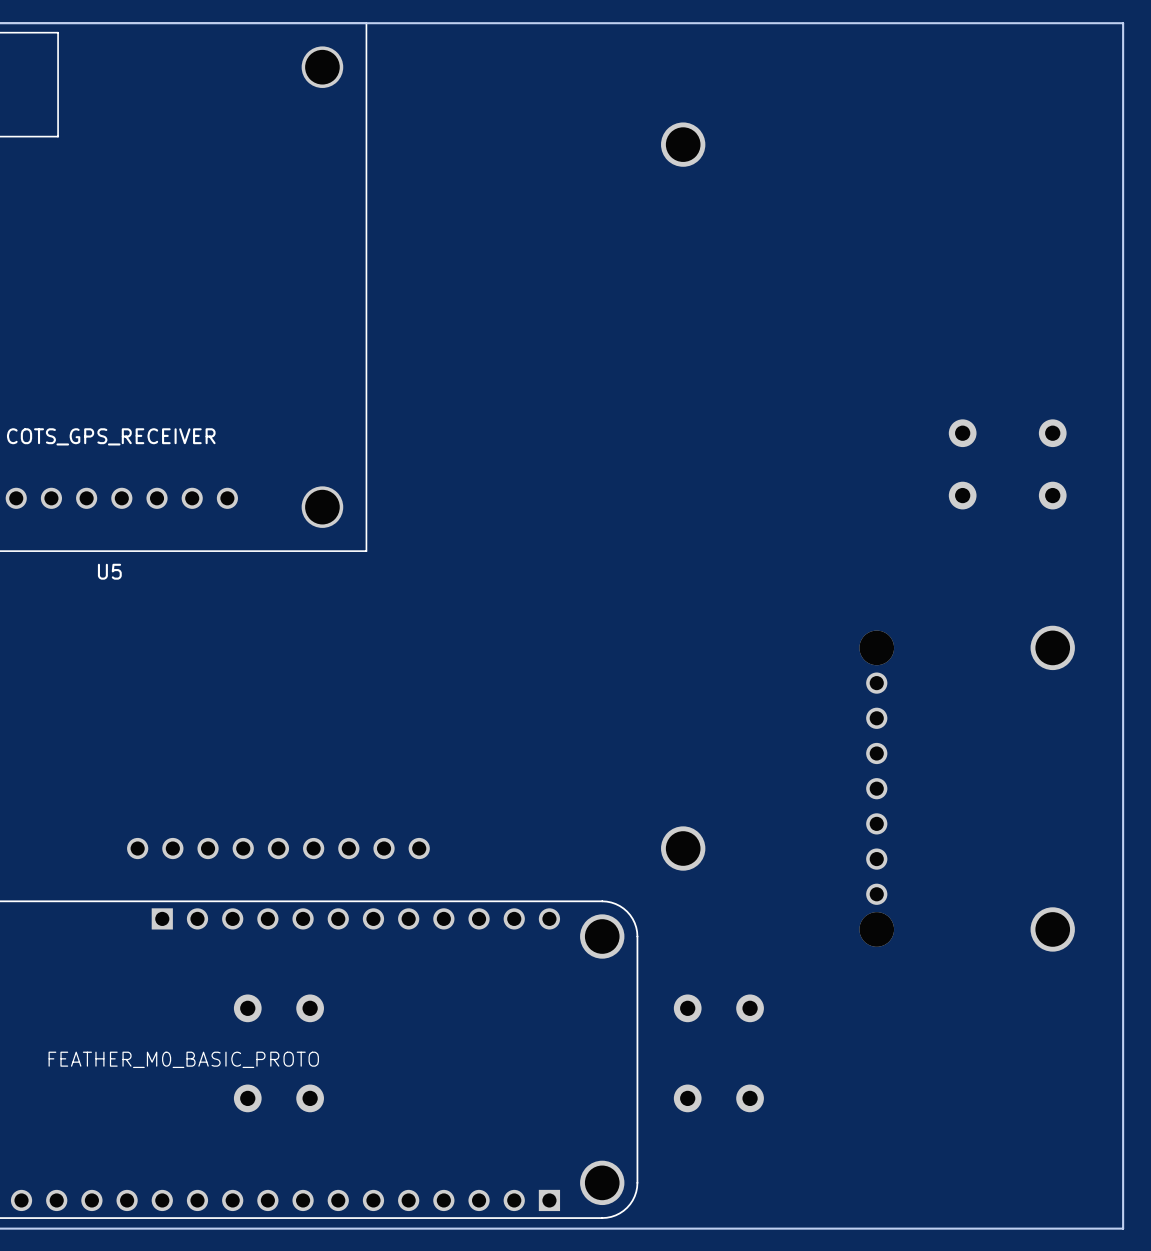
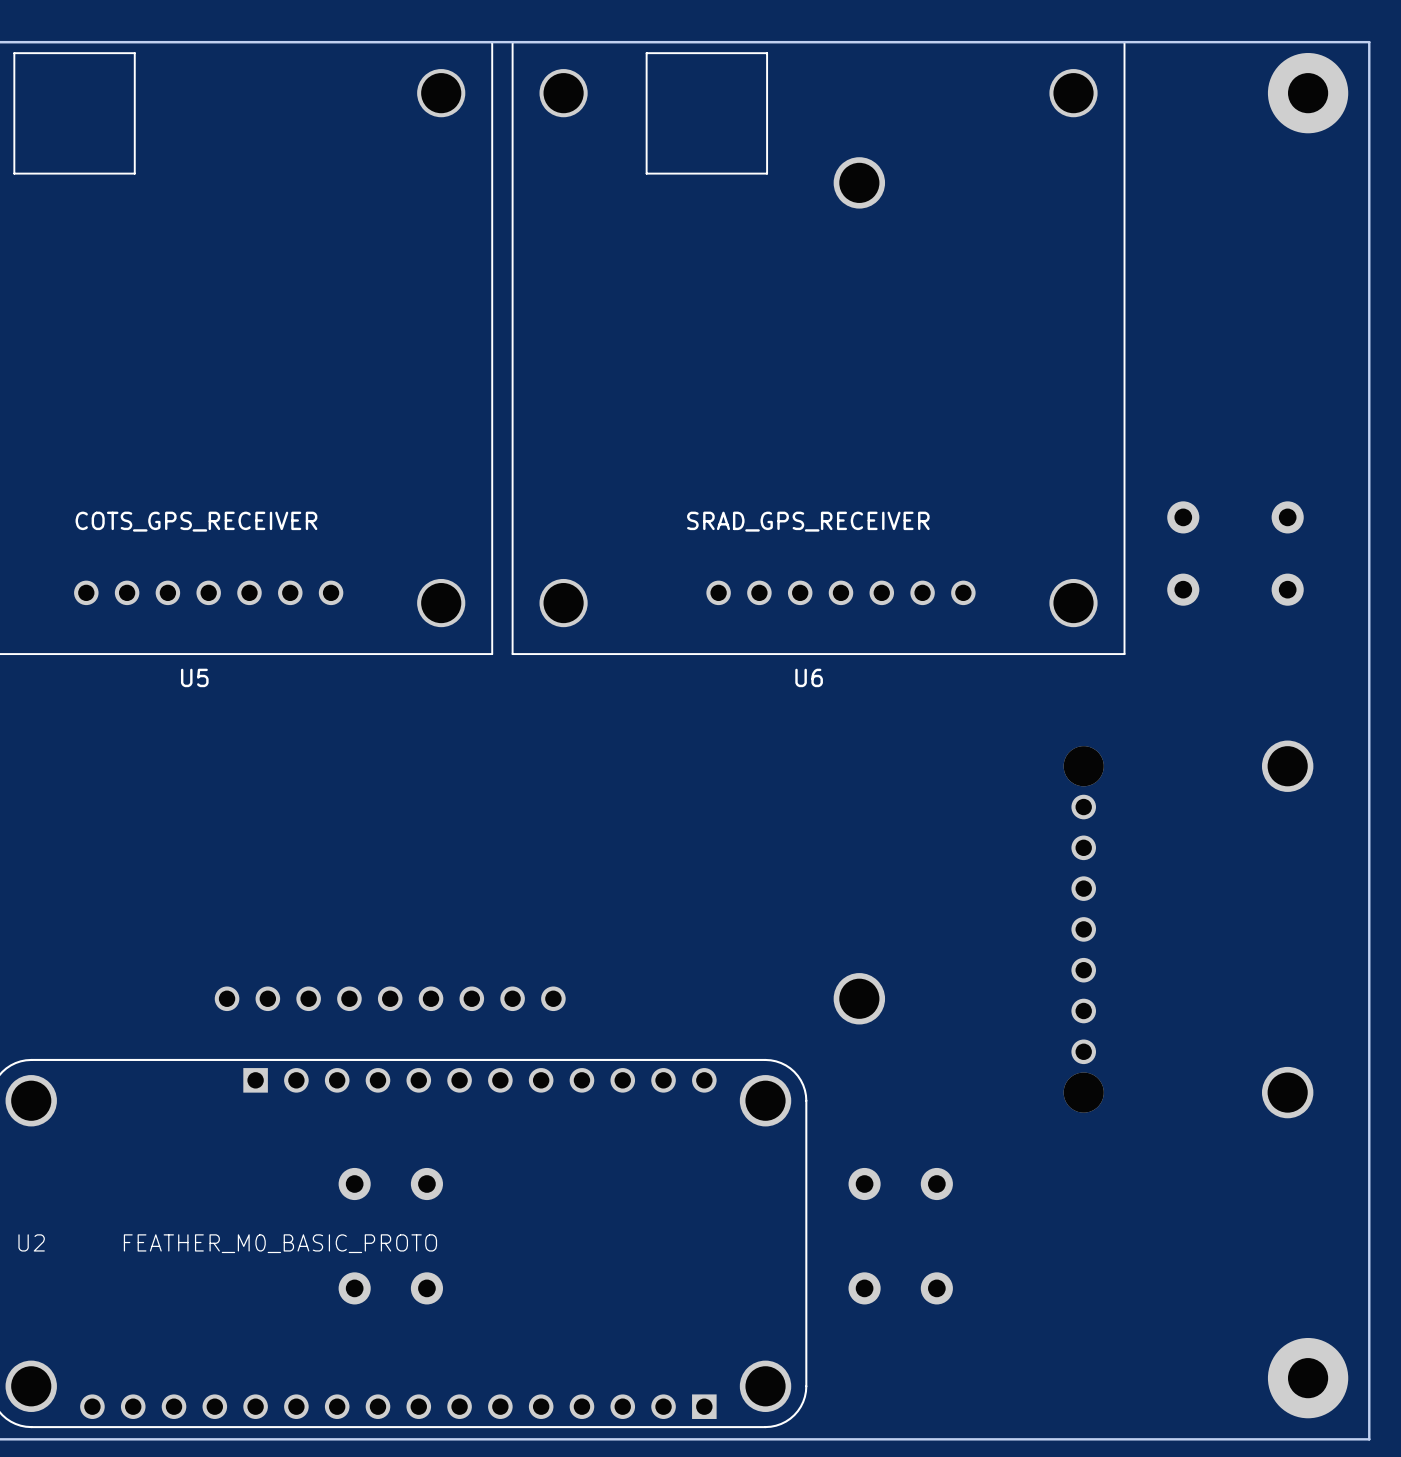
part: none -> (1308, 93)
U6: none -> SRAD_GPS_RECEIVER (818, 348)
part: none -> (1308, 1378)

